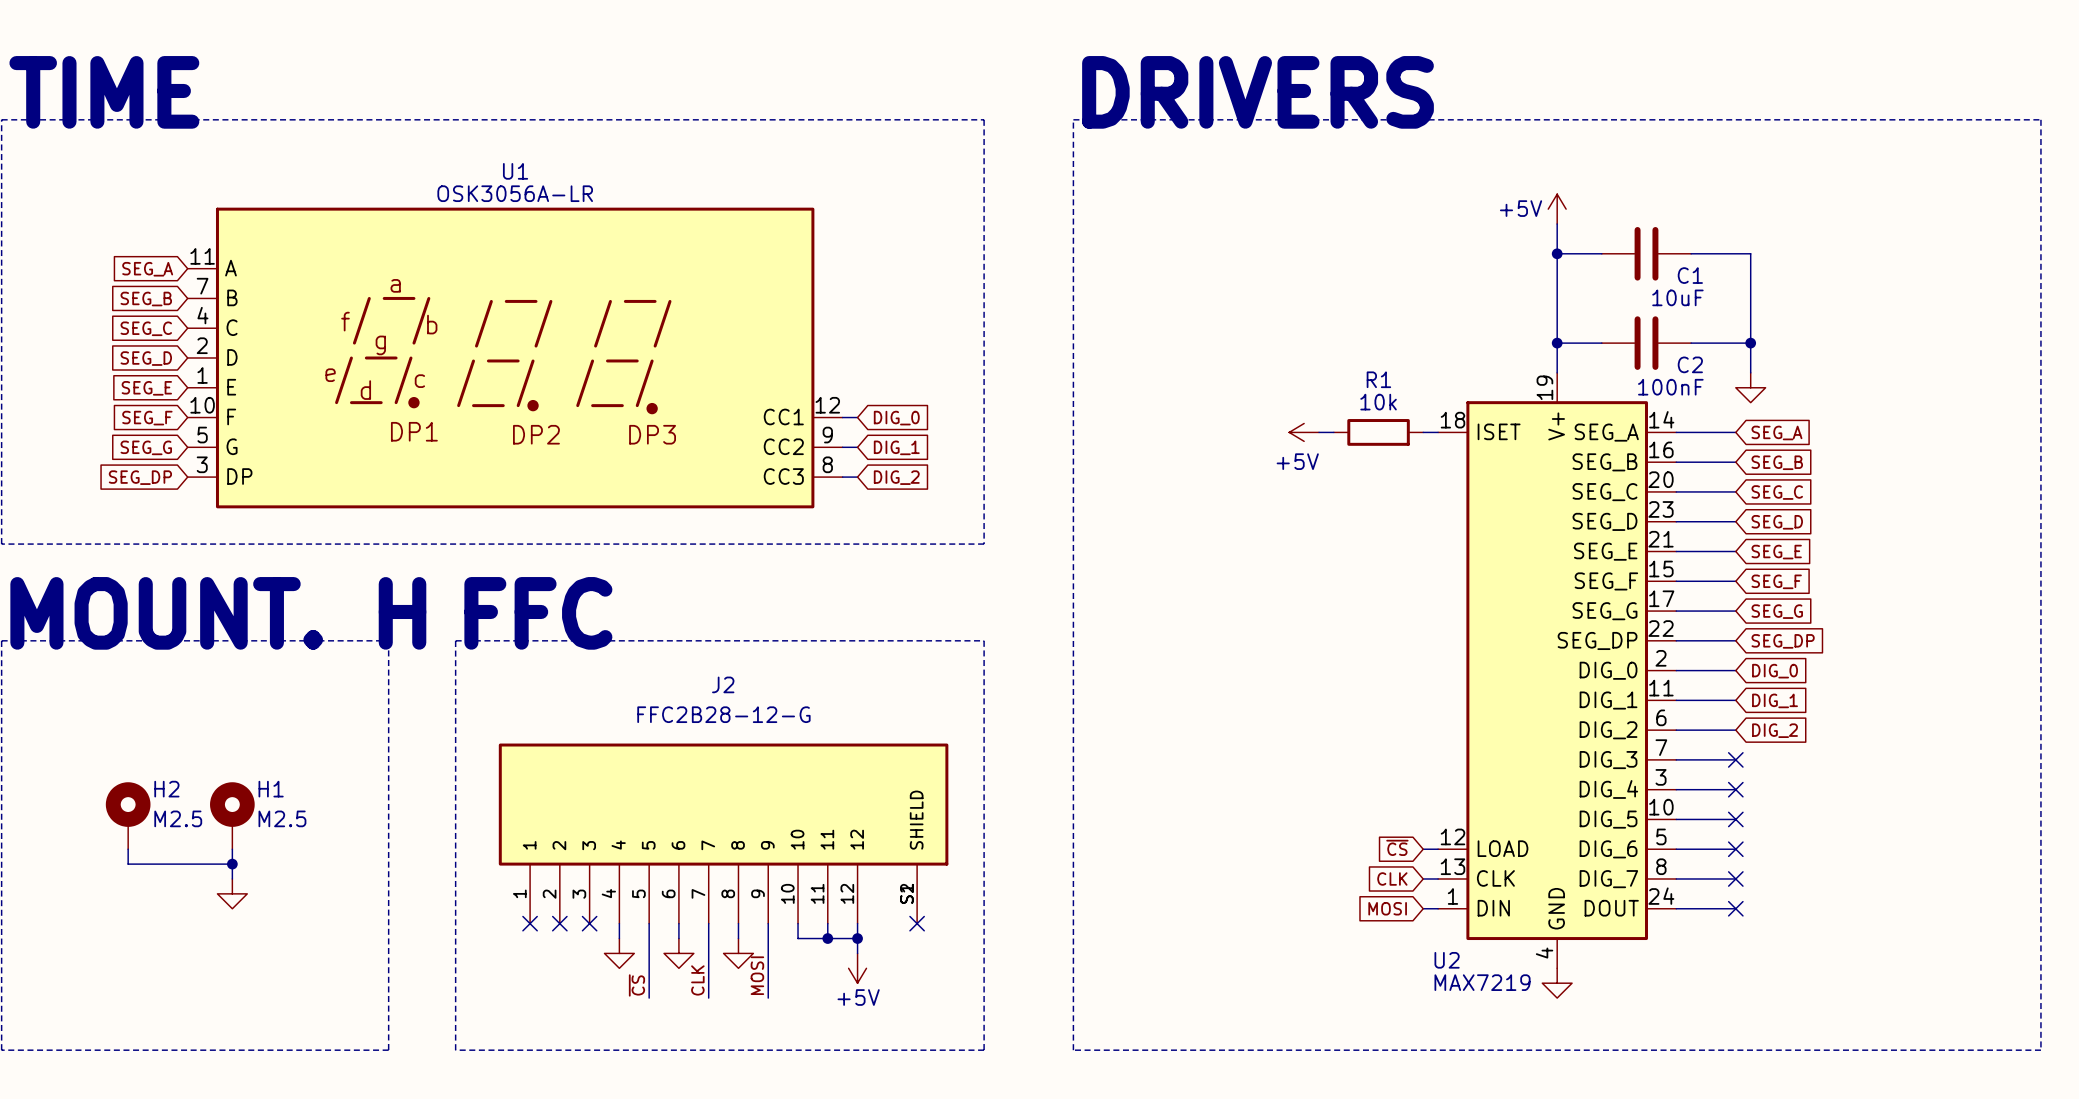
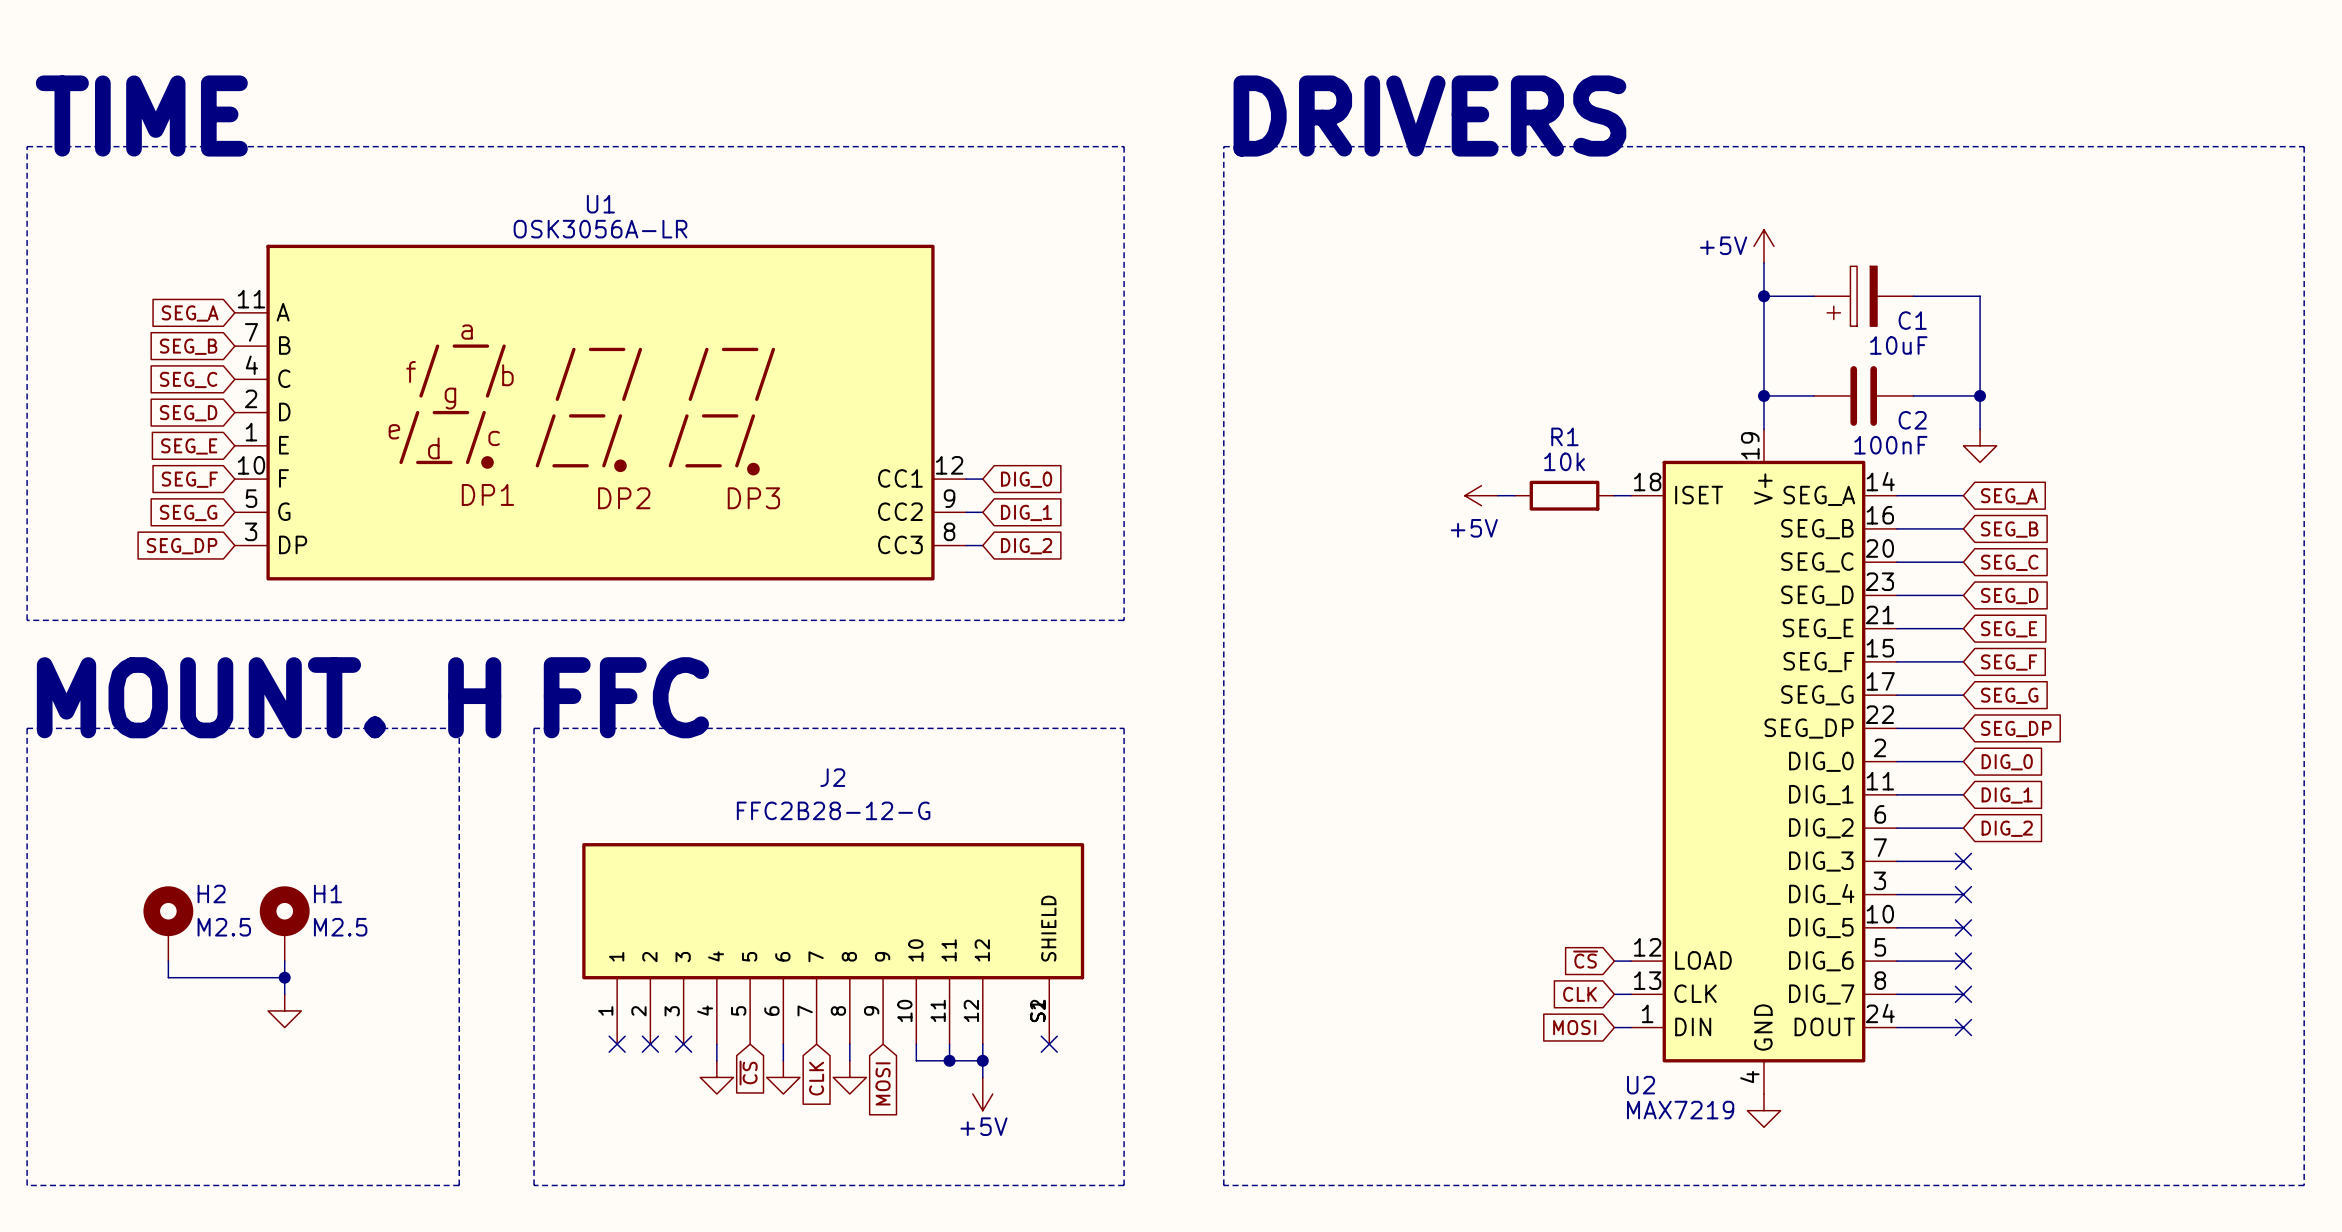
C1 symbol: [1601, 227, 1692, 281] -> [1813, 266, 1914, 327]
wire: (649, 923) (649, 998) -> none
wire: (708, 923) (708, 998) -> none
wire: (768, 923) (768, 998) -> none
global label: none -> ~{CS} (748, 1073)
global label: none -> CLK (816, 1078)
global label: none -> MOSI (883, 1083)
label: MOSI (757, 975) -> none
label: CLK (697, 980) -> none
label: ~{CS} (636, 985) -> none

